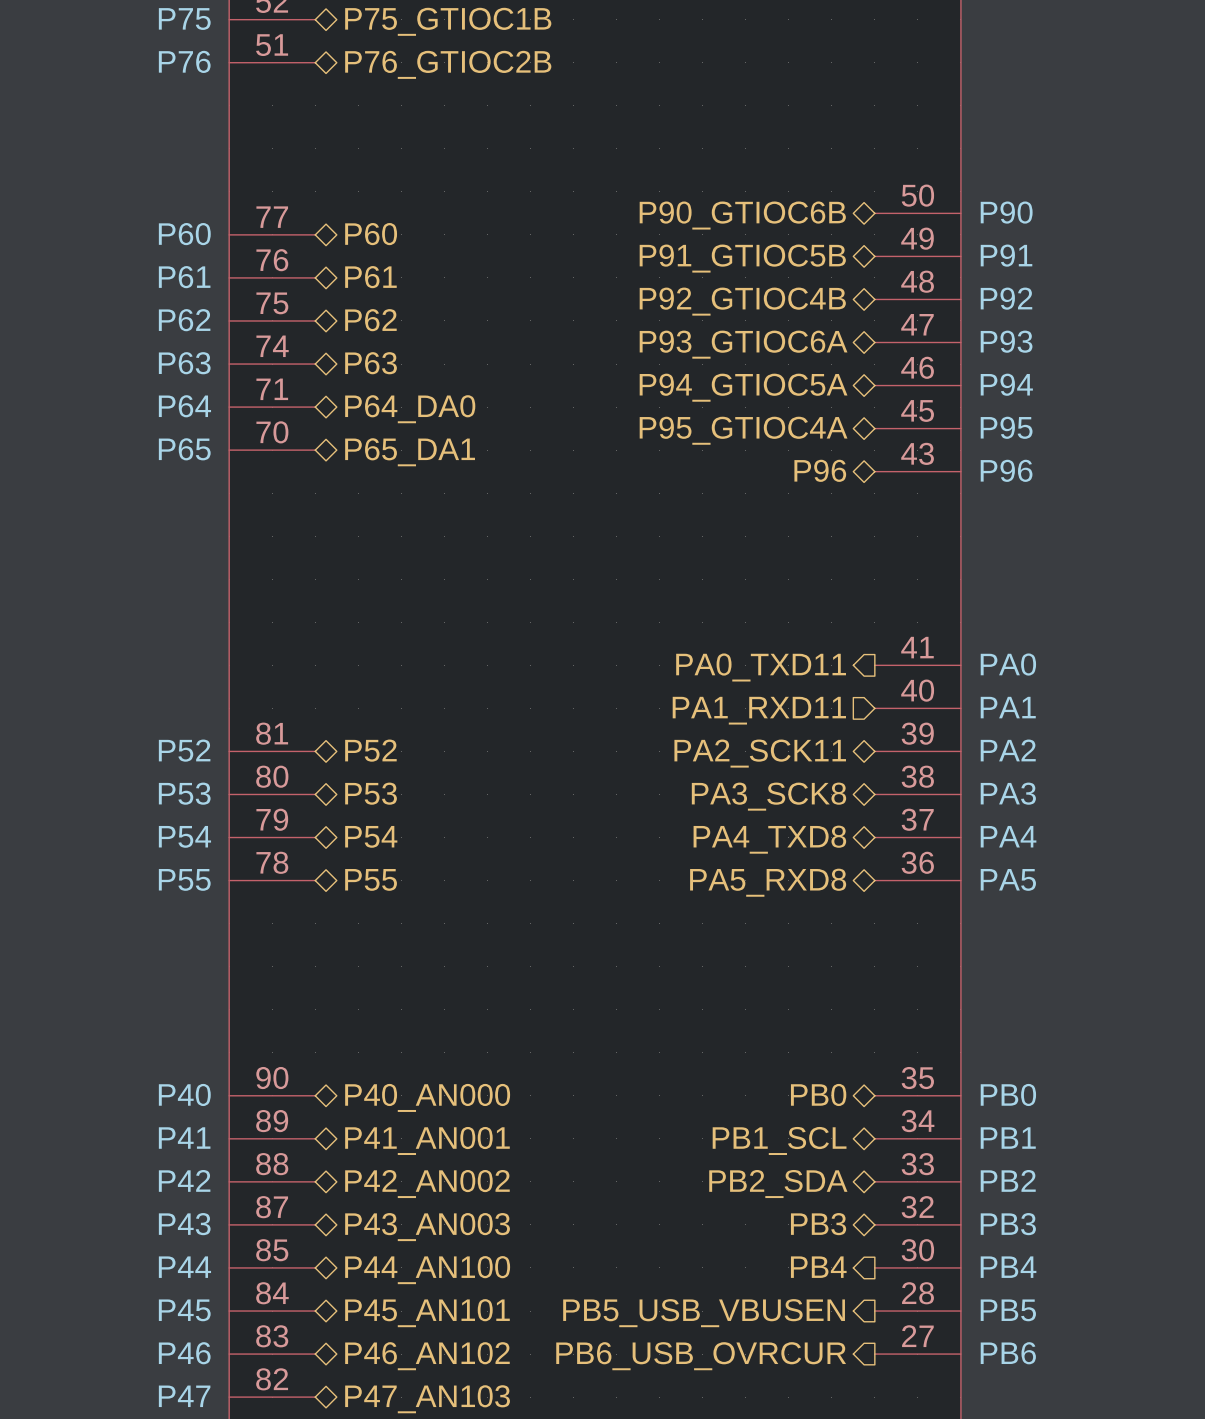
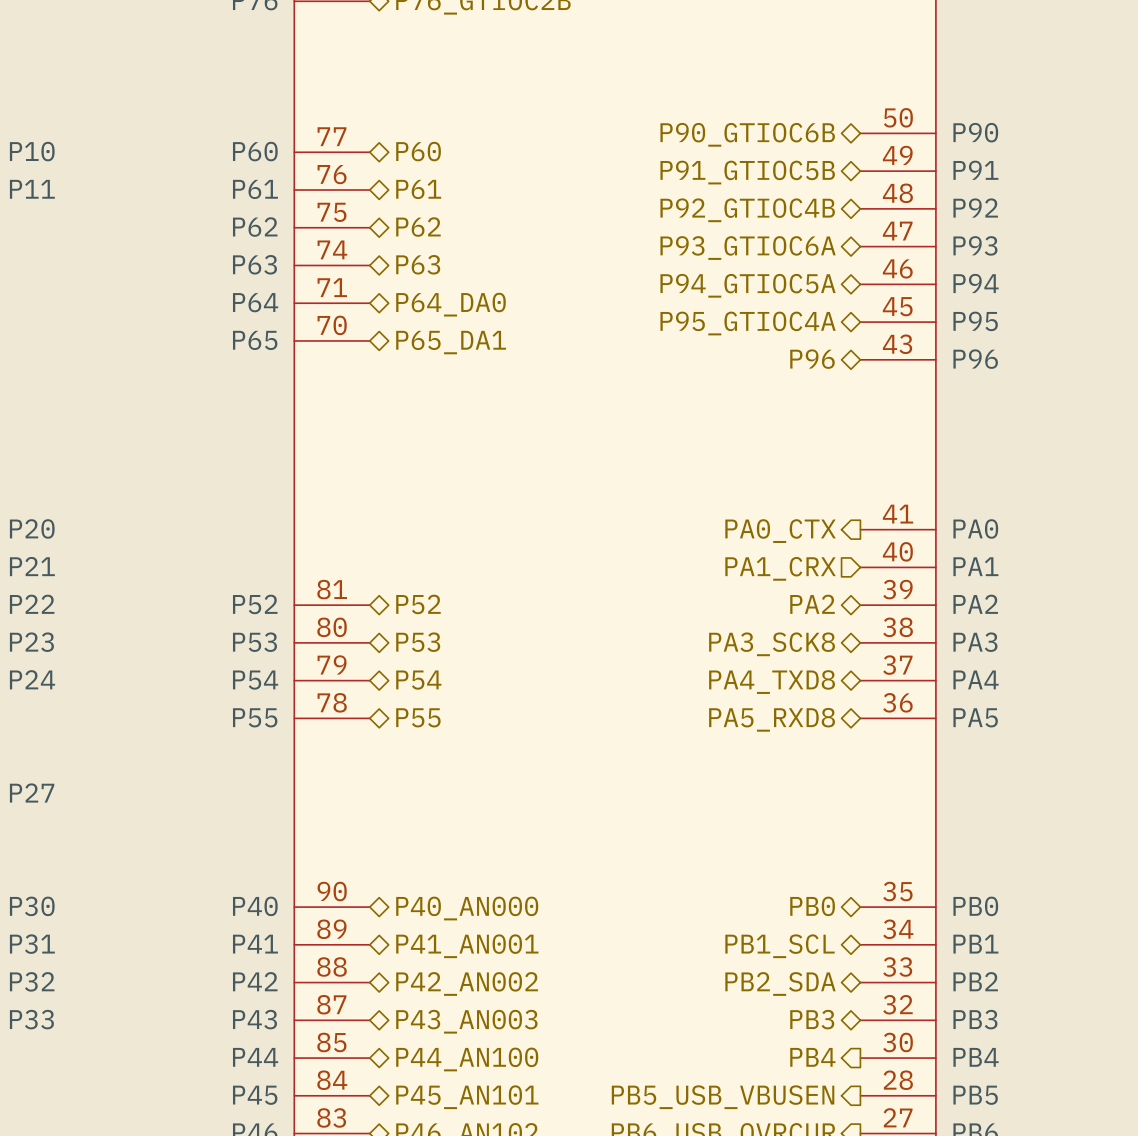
hierarchical label: PA0_TXD11 (761, 667) -> PA0_CTX (780, 531)
hierarchical label: PA1_RXD11 (759, 710) -> PA1_CRX (780, 568)
hierarchical label: PA2_SCK11 (760, 753) -> PA2 (812, 604)

